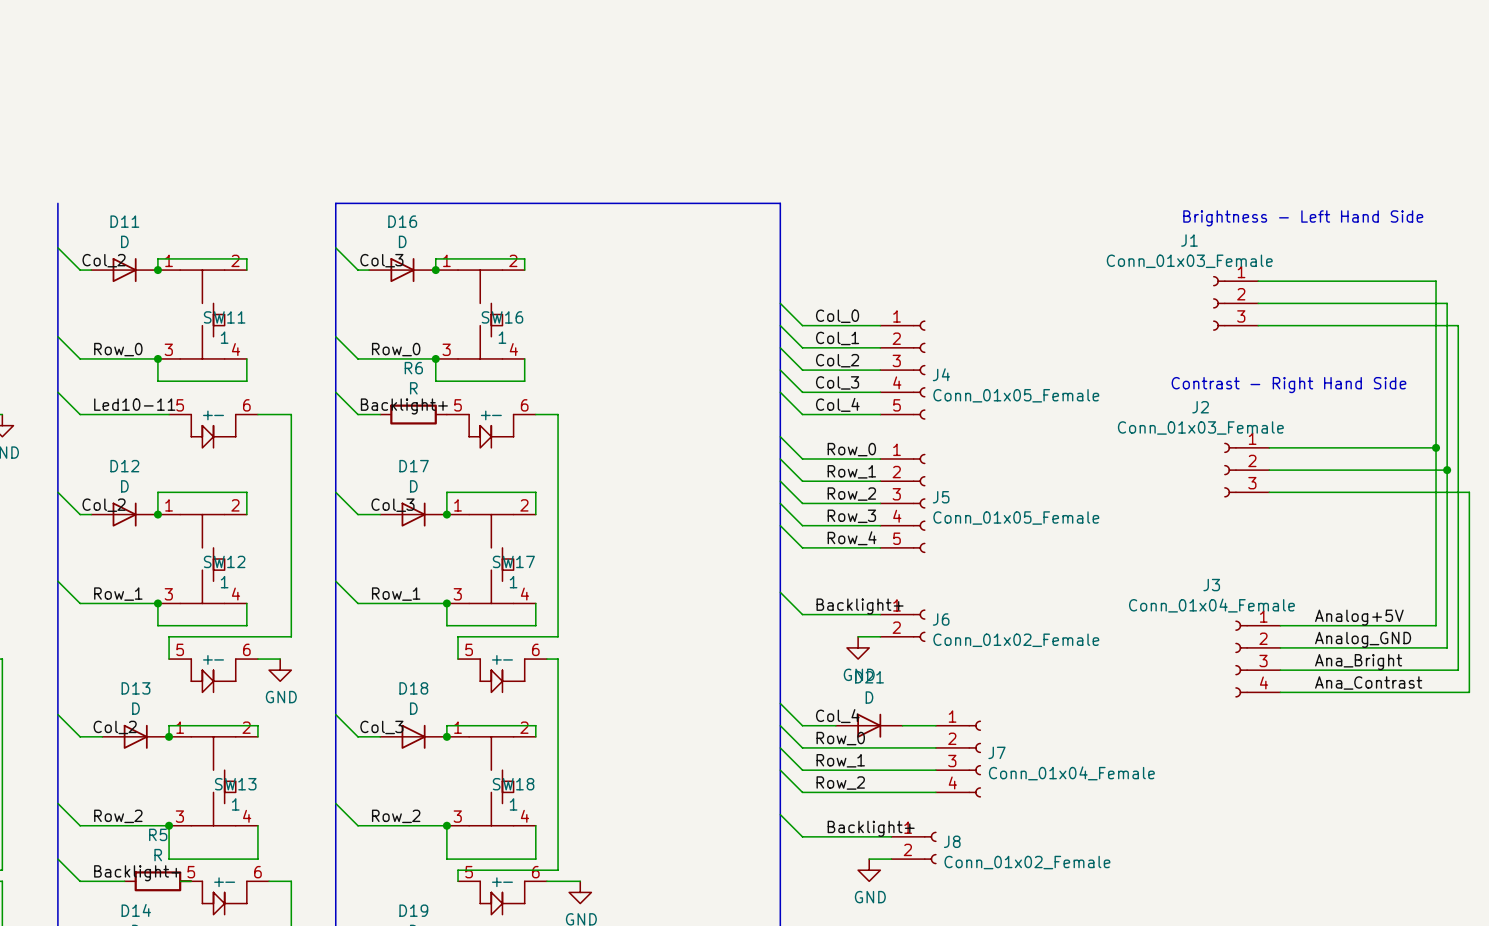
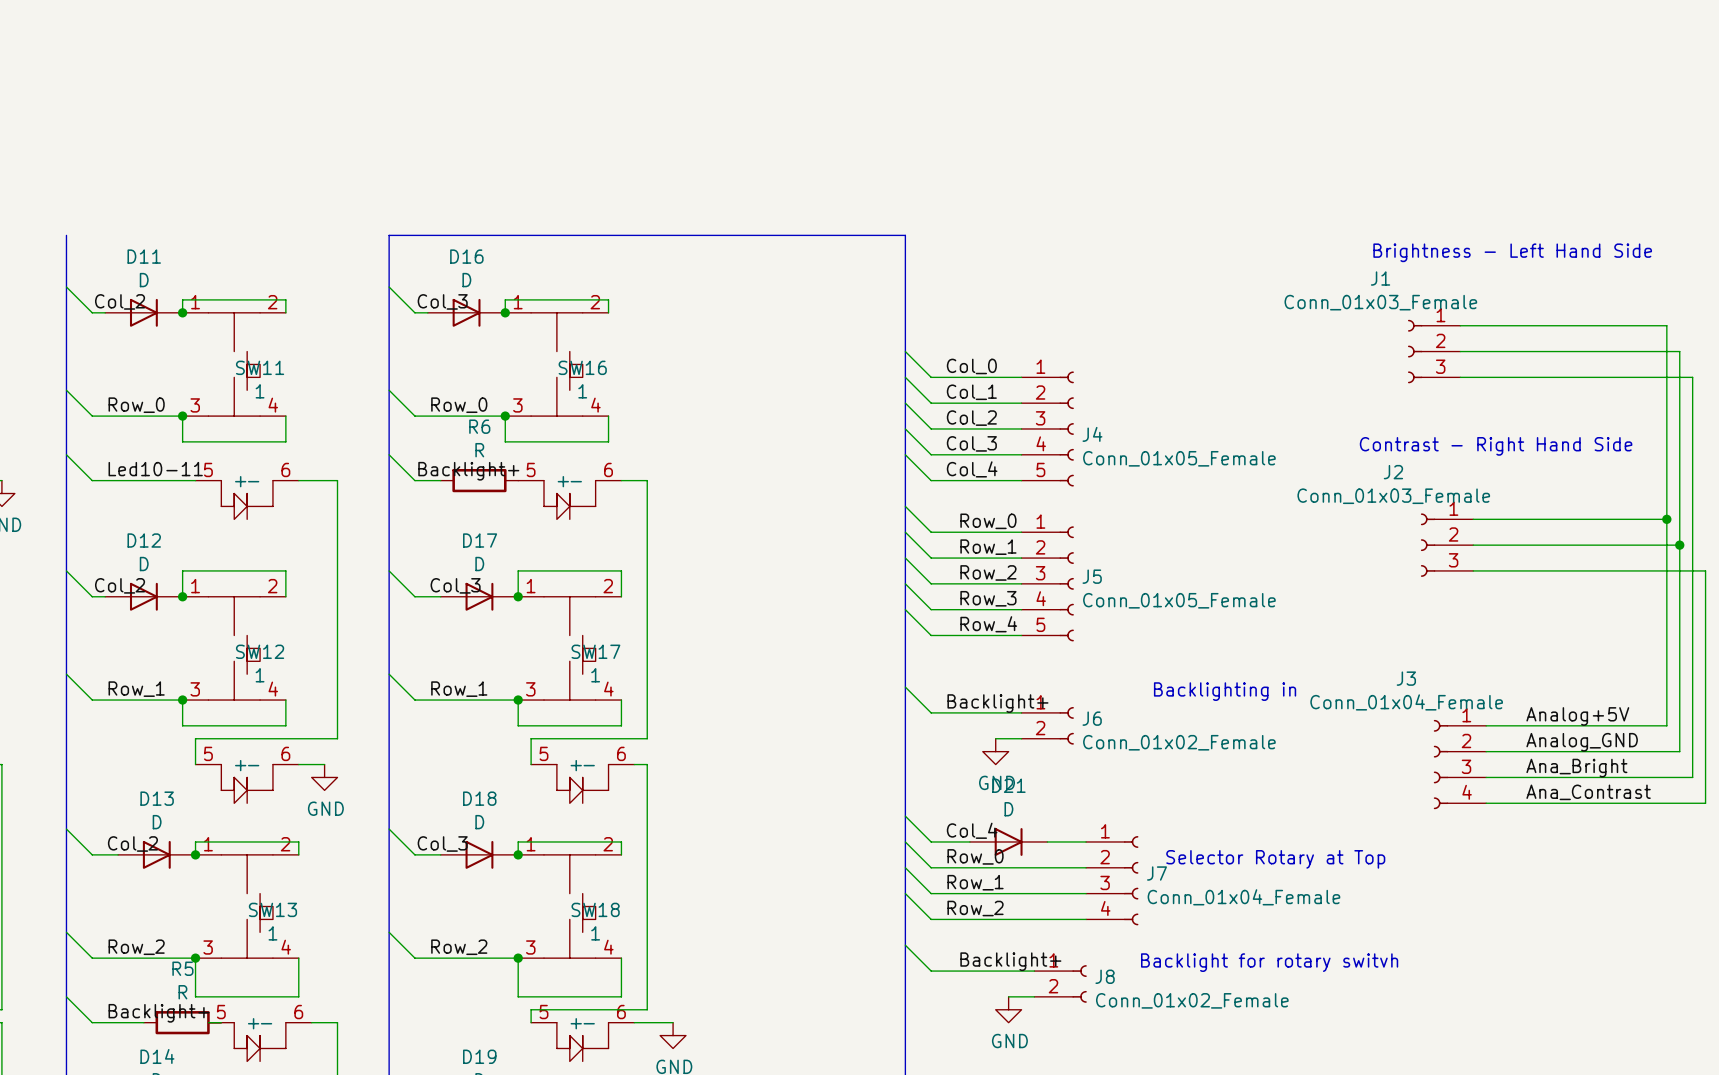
text: none -> Backlighting in (1225, 691)
text: none -> Selector Rotary at Top (1275, 859)
text: none -> Backlight for rotary switvh (1269, 962)

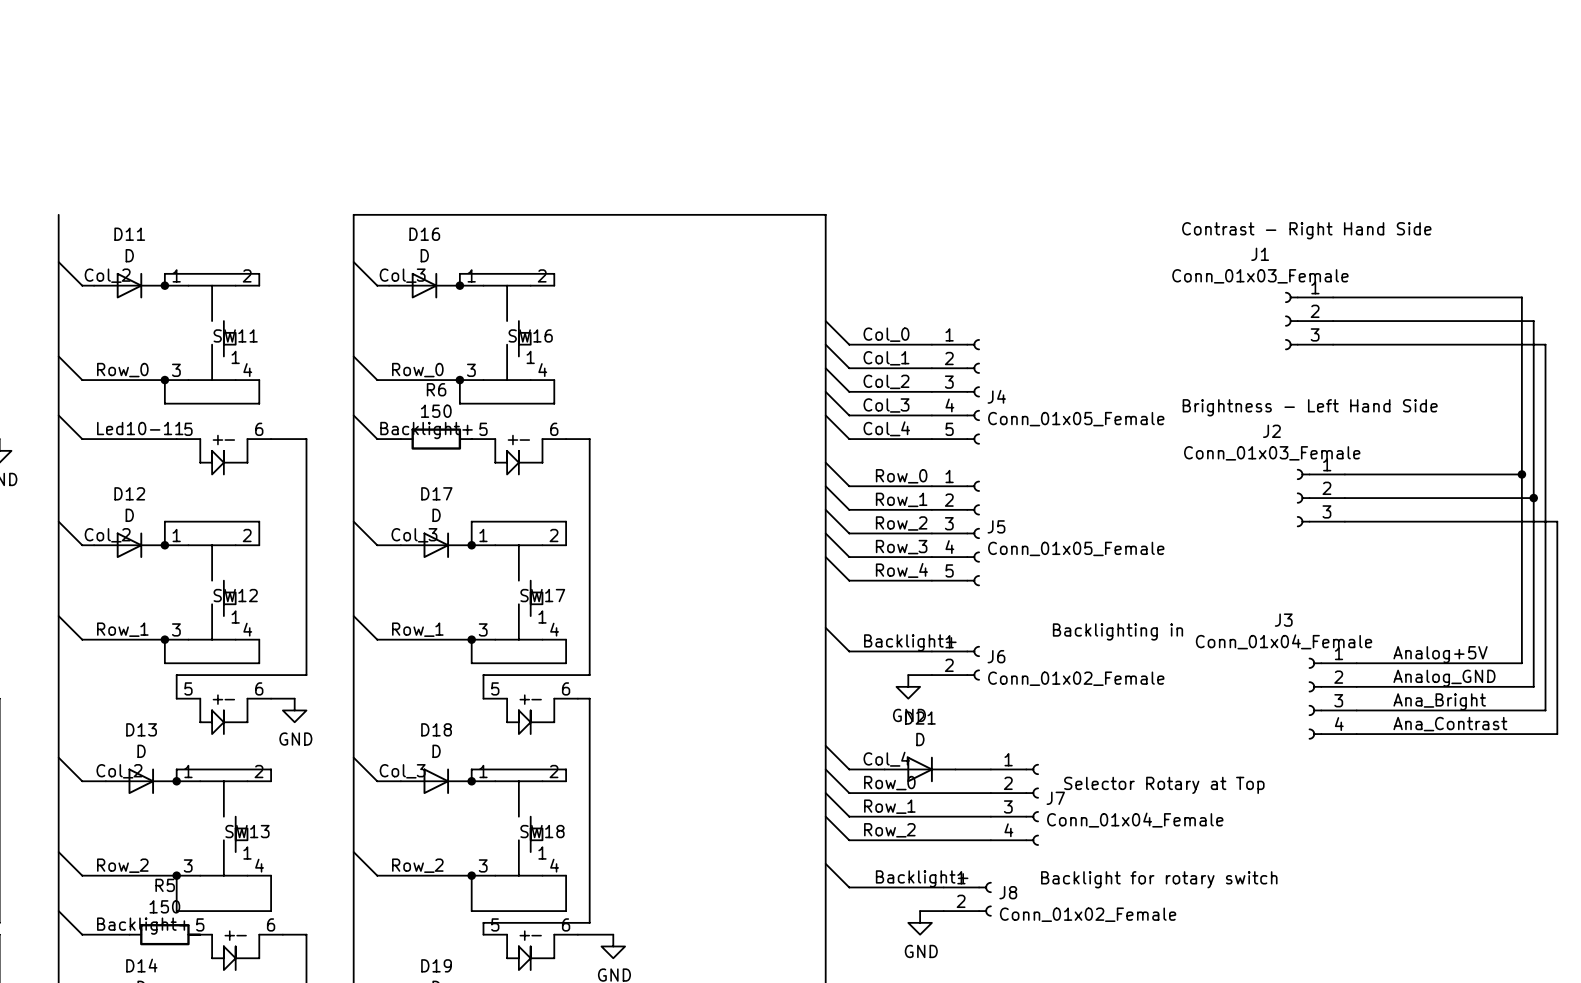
text position: Brightness - Left Hand Side (1512, 252) -> Brightness - Left Hand Side (1310, 407)
text position: Contrast - Right Hand Side (1496, 446) -> Contrast - Right Hand Side (1306, 230)
R6 value: R (479, 450) -> 150 (436, 411)
text: Backlight for rotary switvh (1269, 962) -> Backlight for rotary switch (1159, 879)
R5 value: R (182, 992) -> 150 (164, 906)

